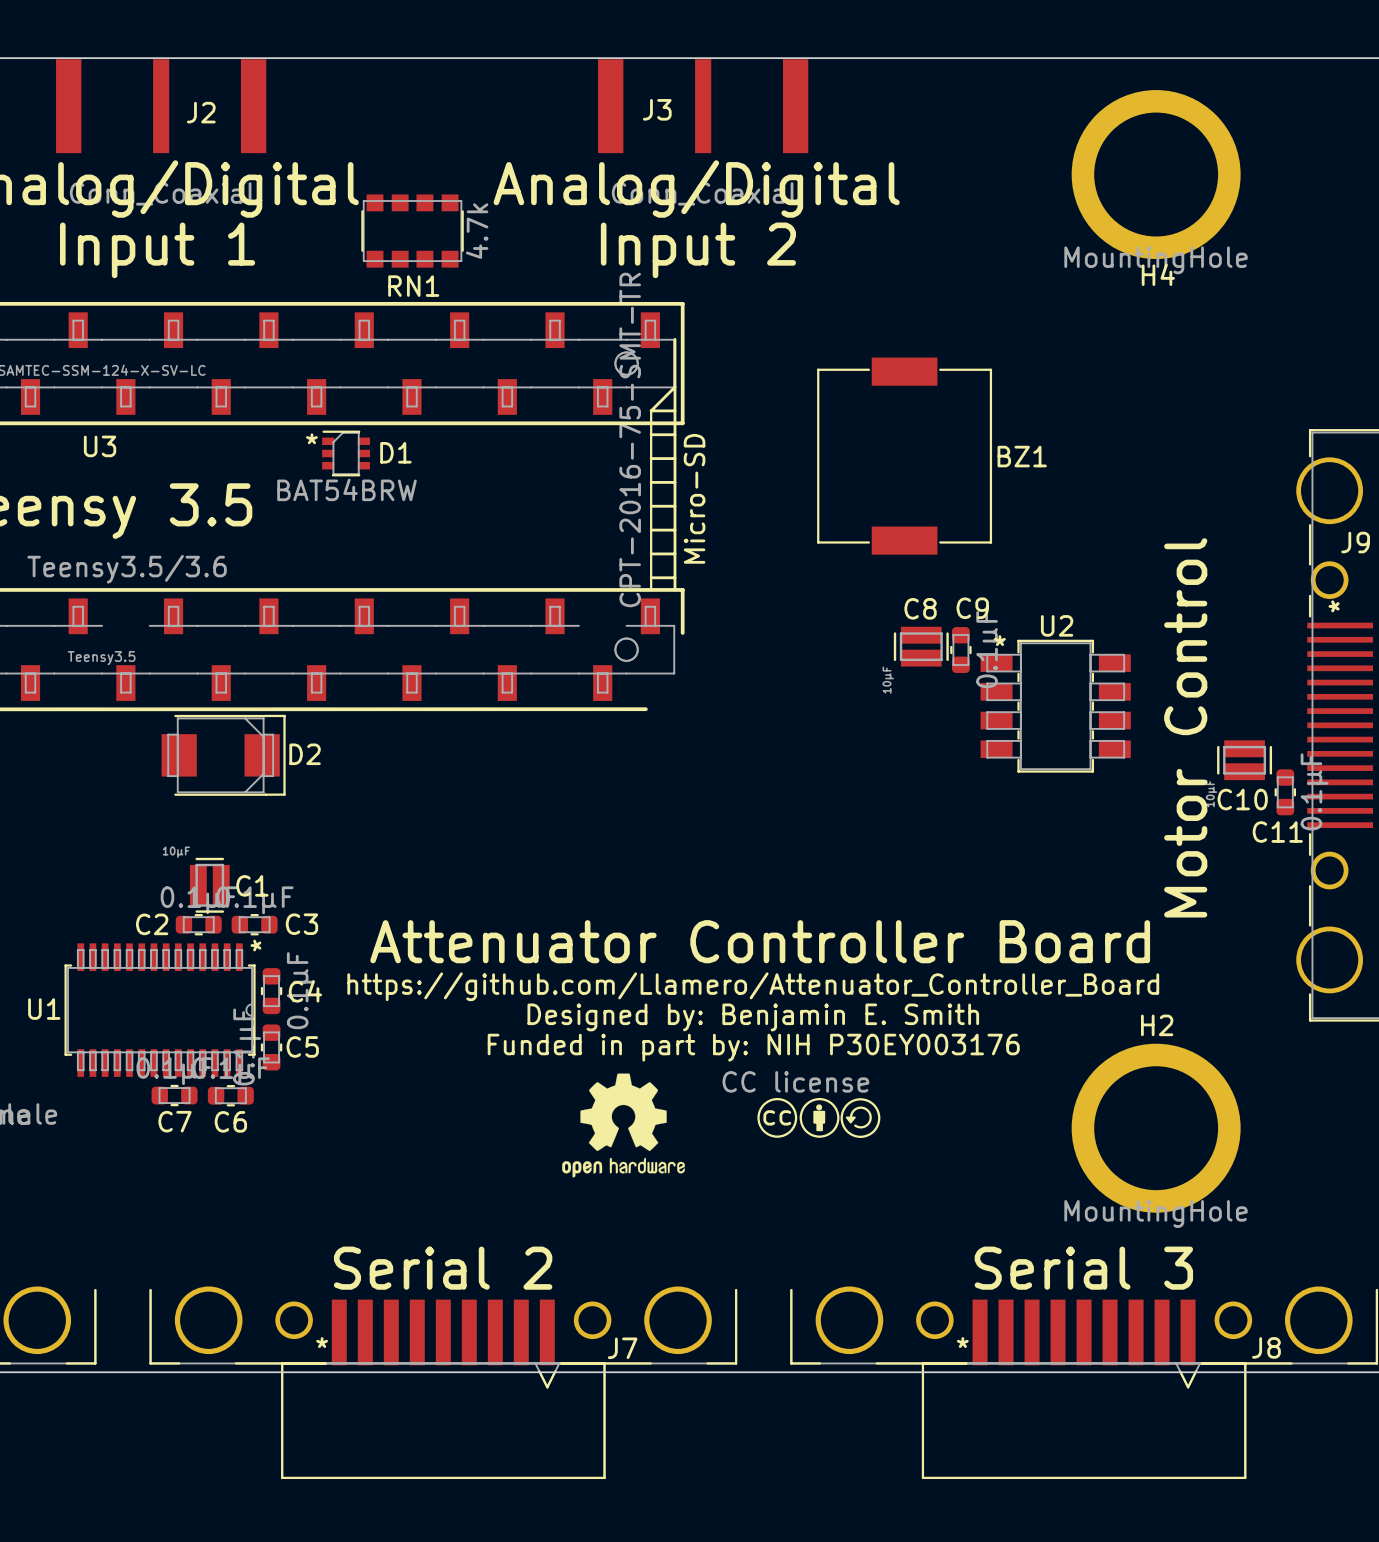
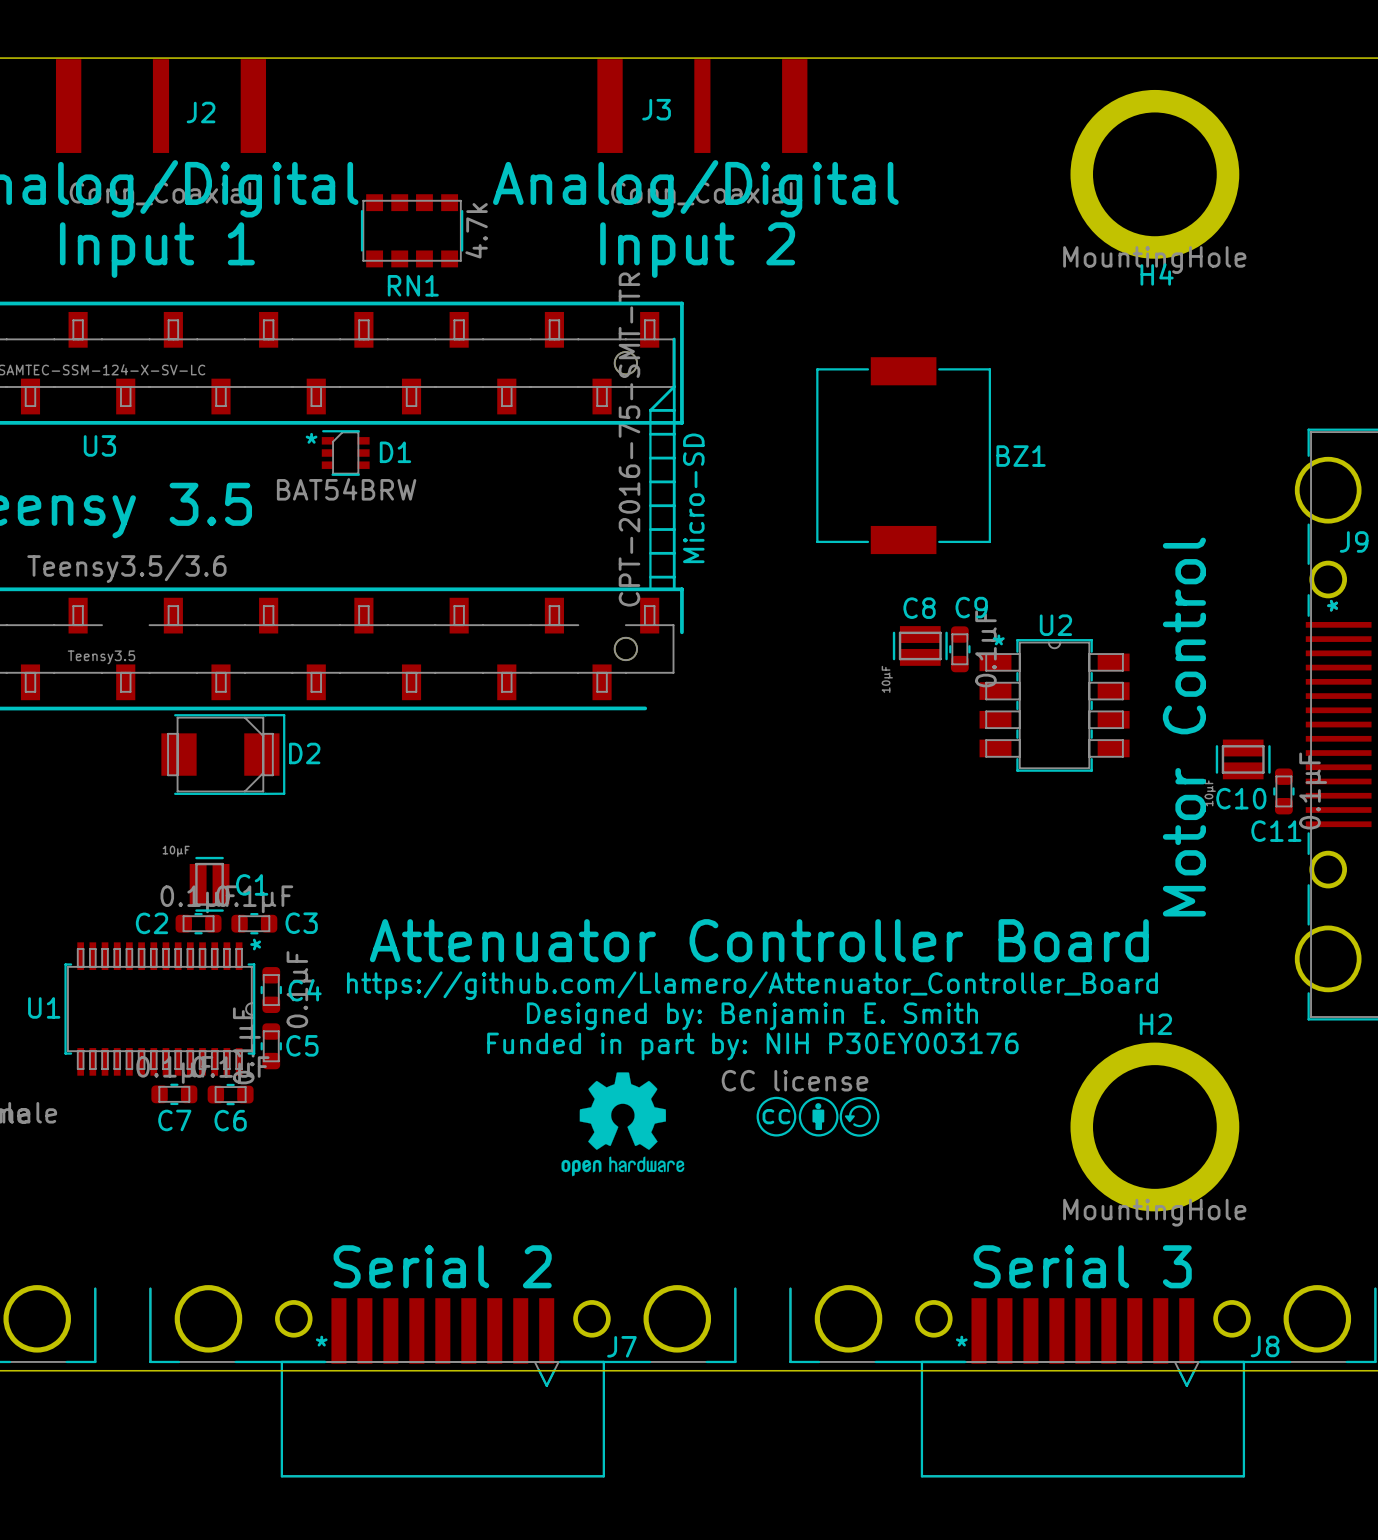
U2 footprint: [980, 639, 1131, 773] -> [979, 639, 1130, 772]

